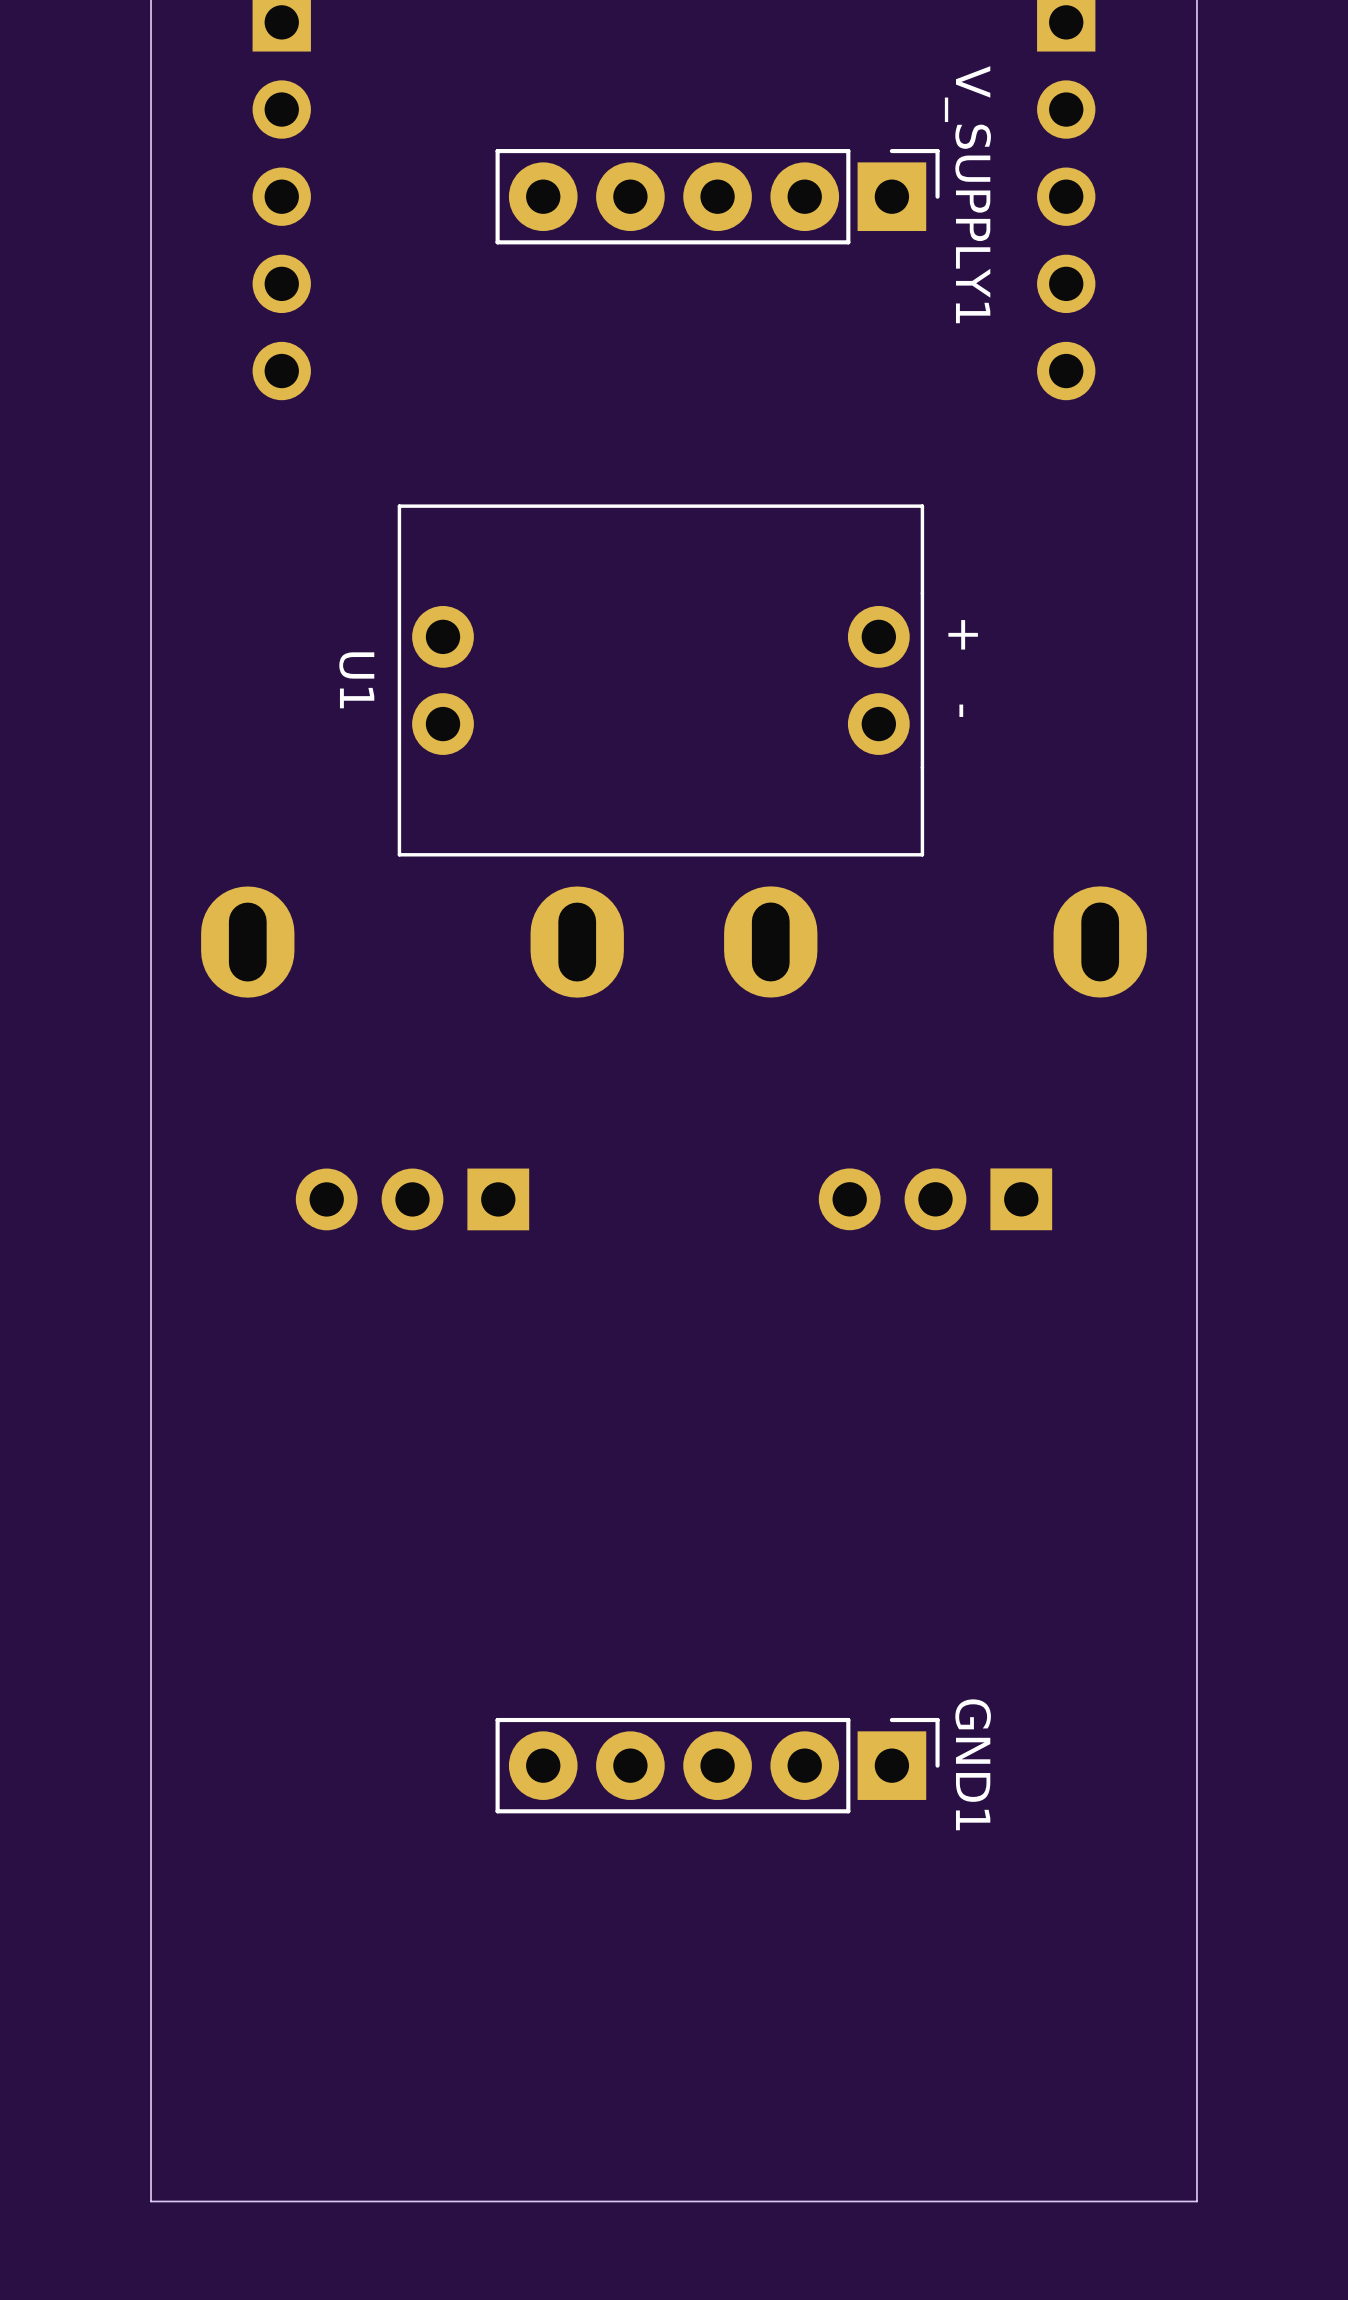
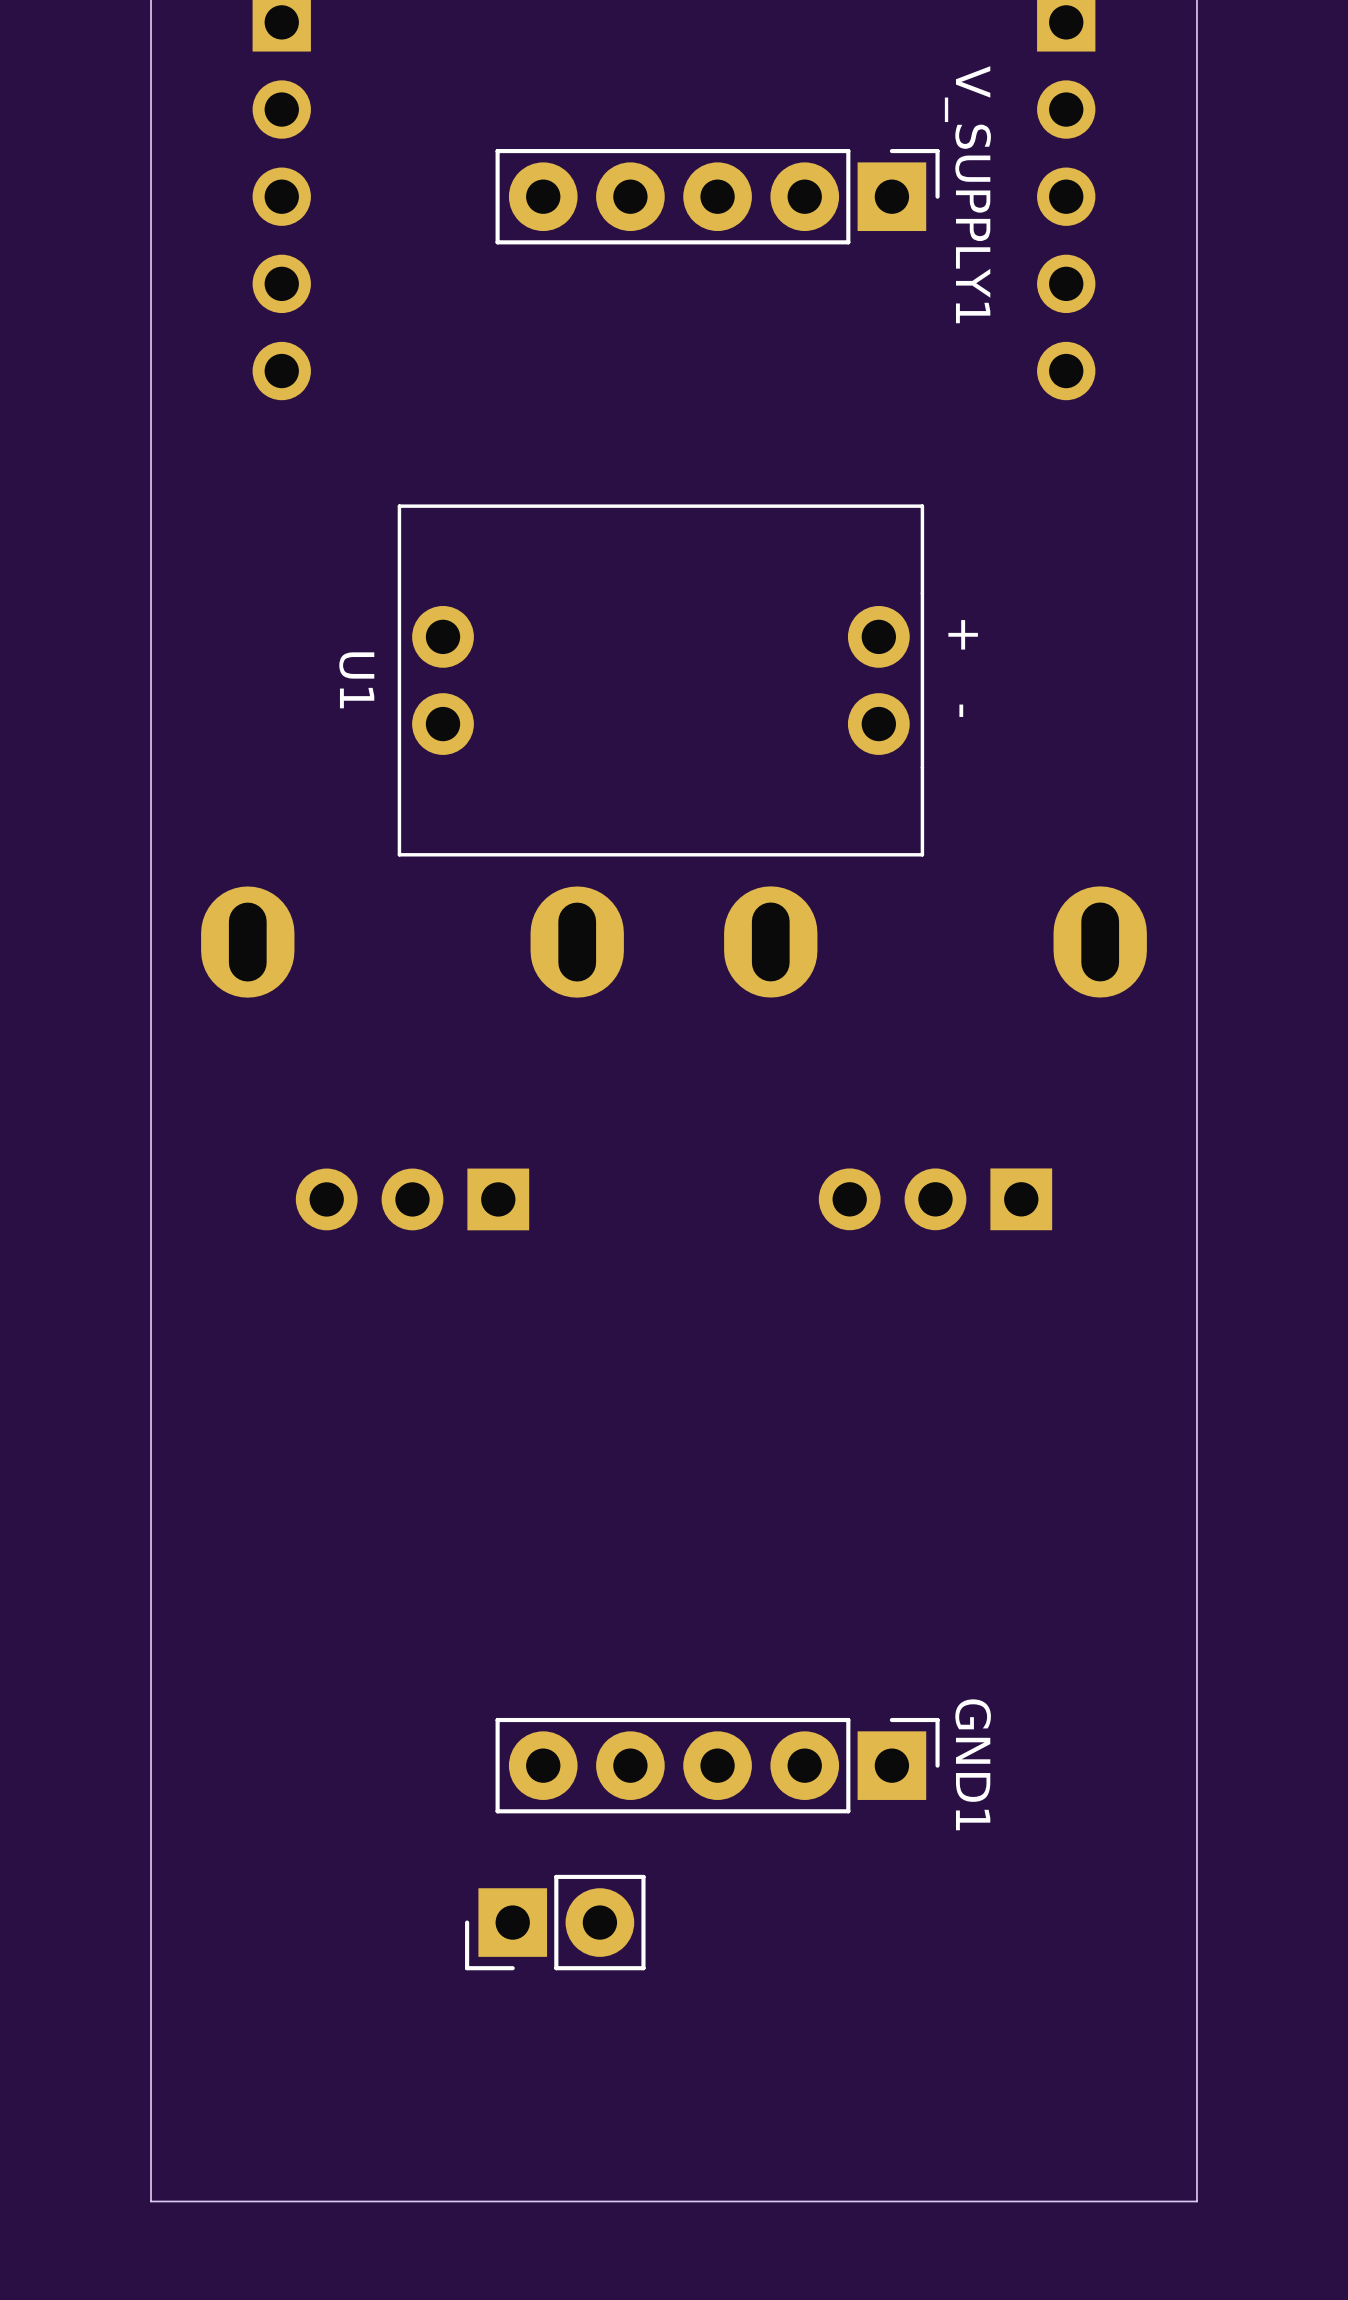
part: none -> (555, 1922)

